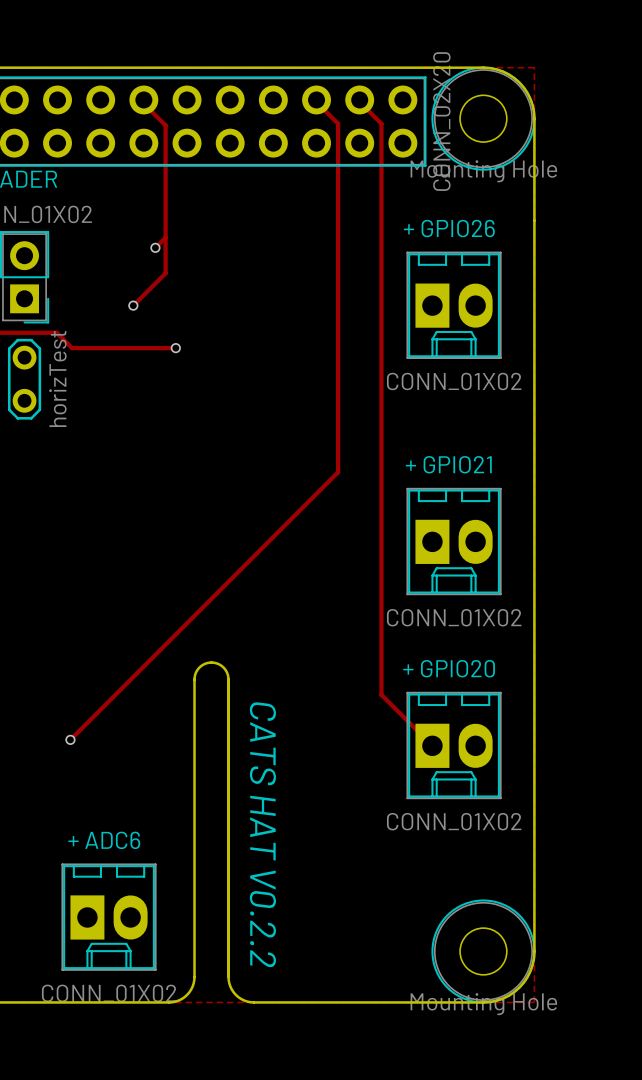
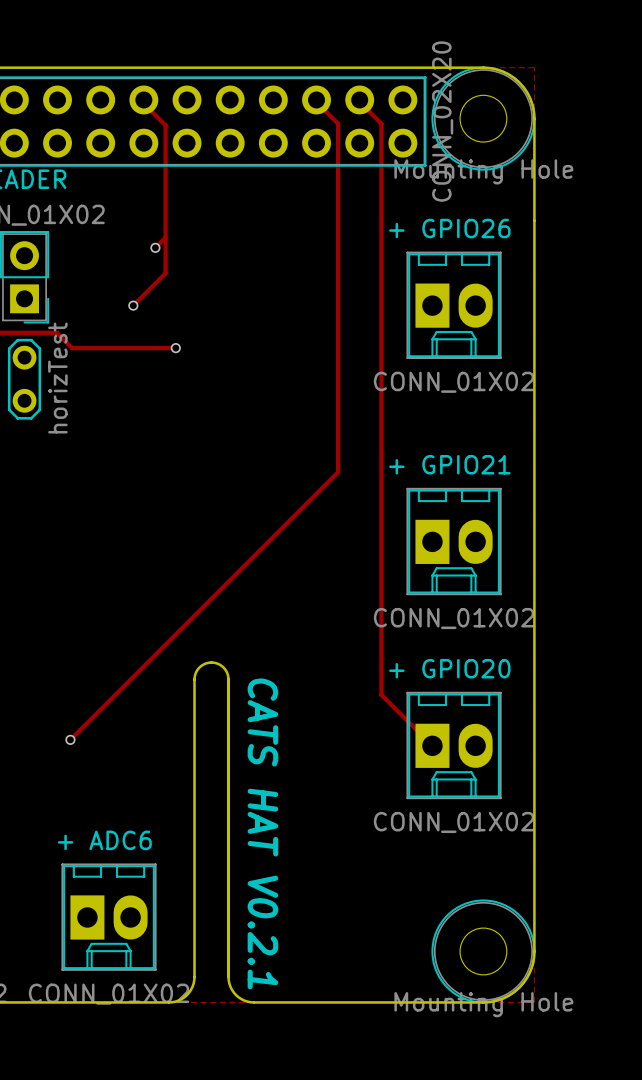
text: CATS HAT V0.2.2 (262, 834) -> CATS HAT V0.2.1 (262, 833)

